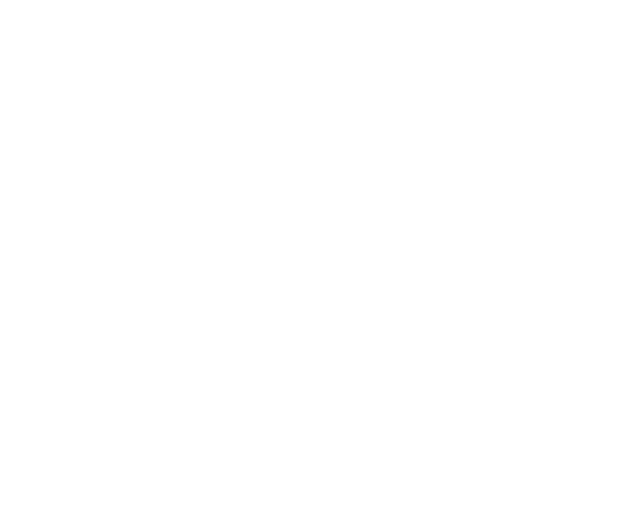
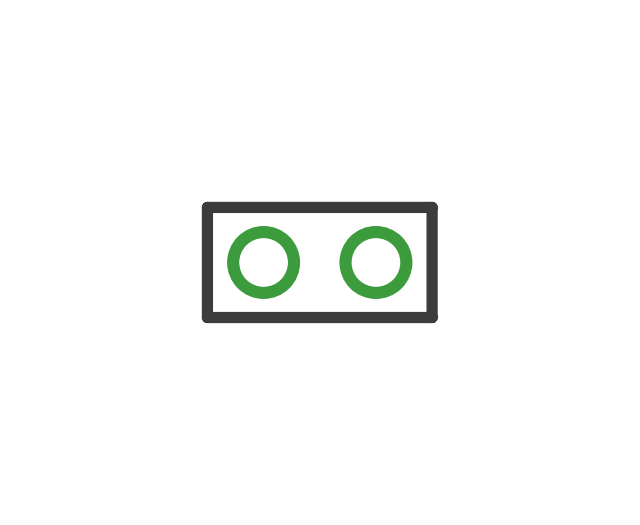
part: none -> (319, 262)

